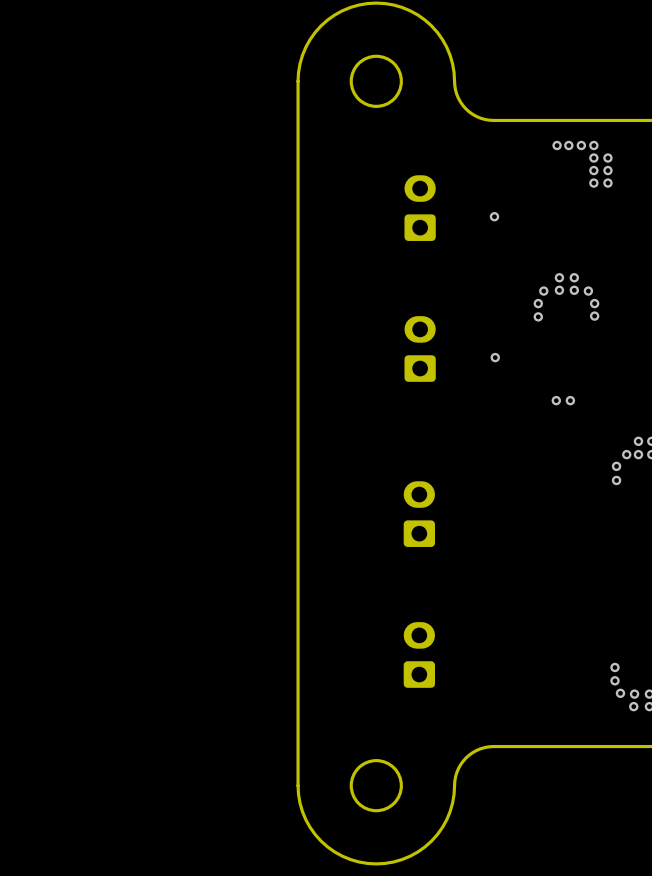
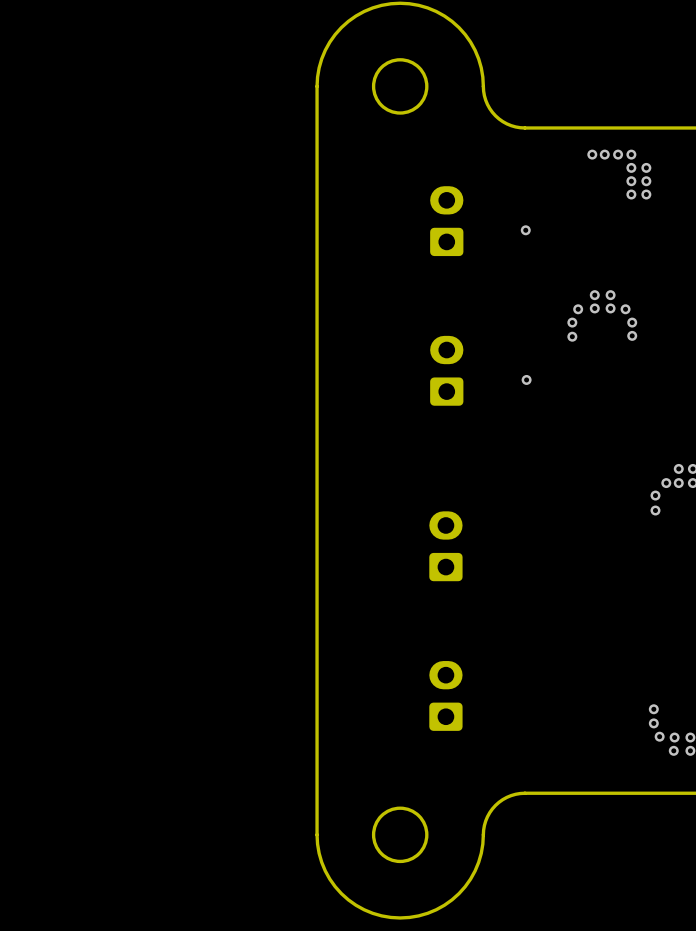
via: (556, 400) -> none
via: (570, 400) -> none

